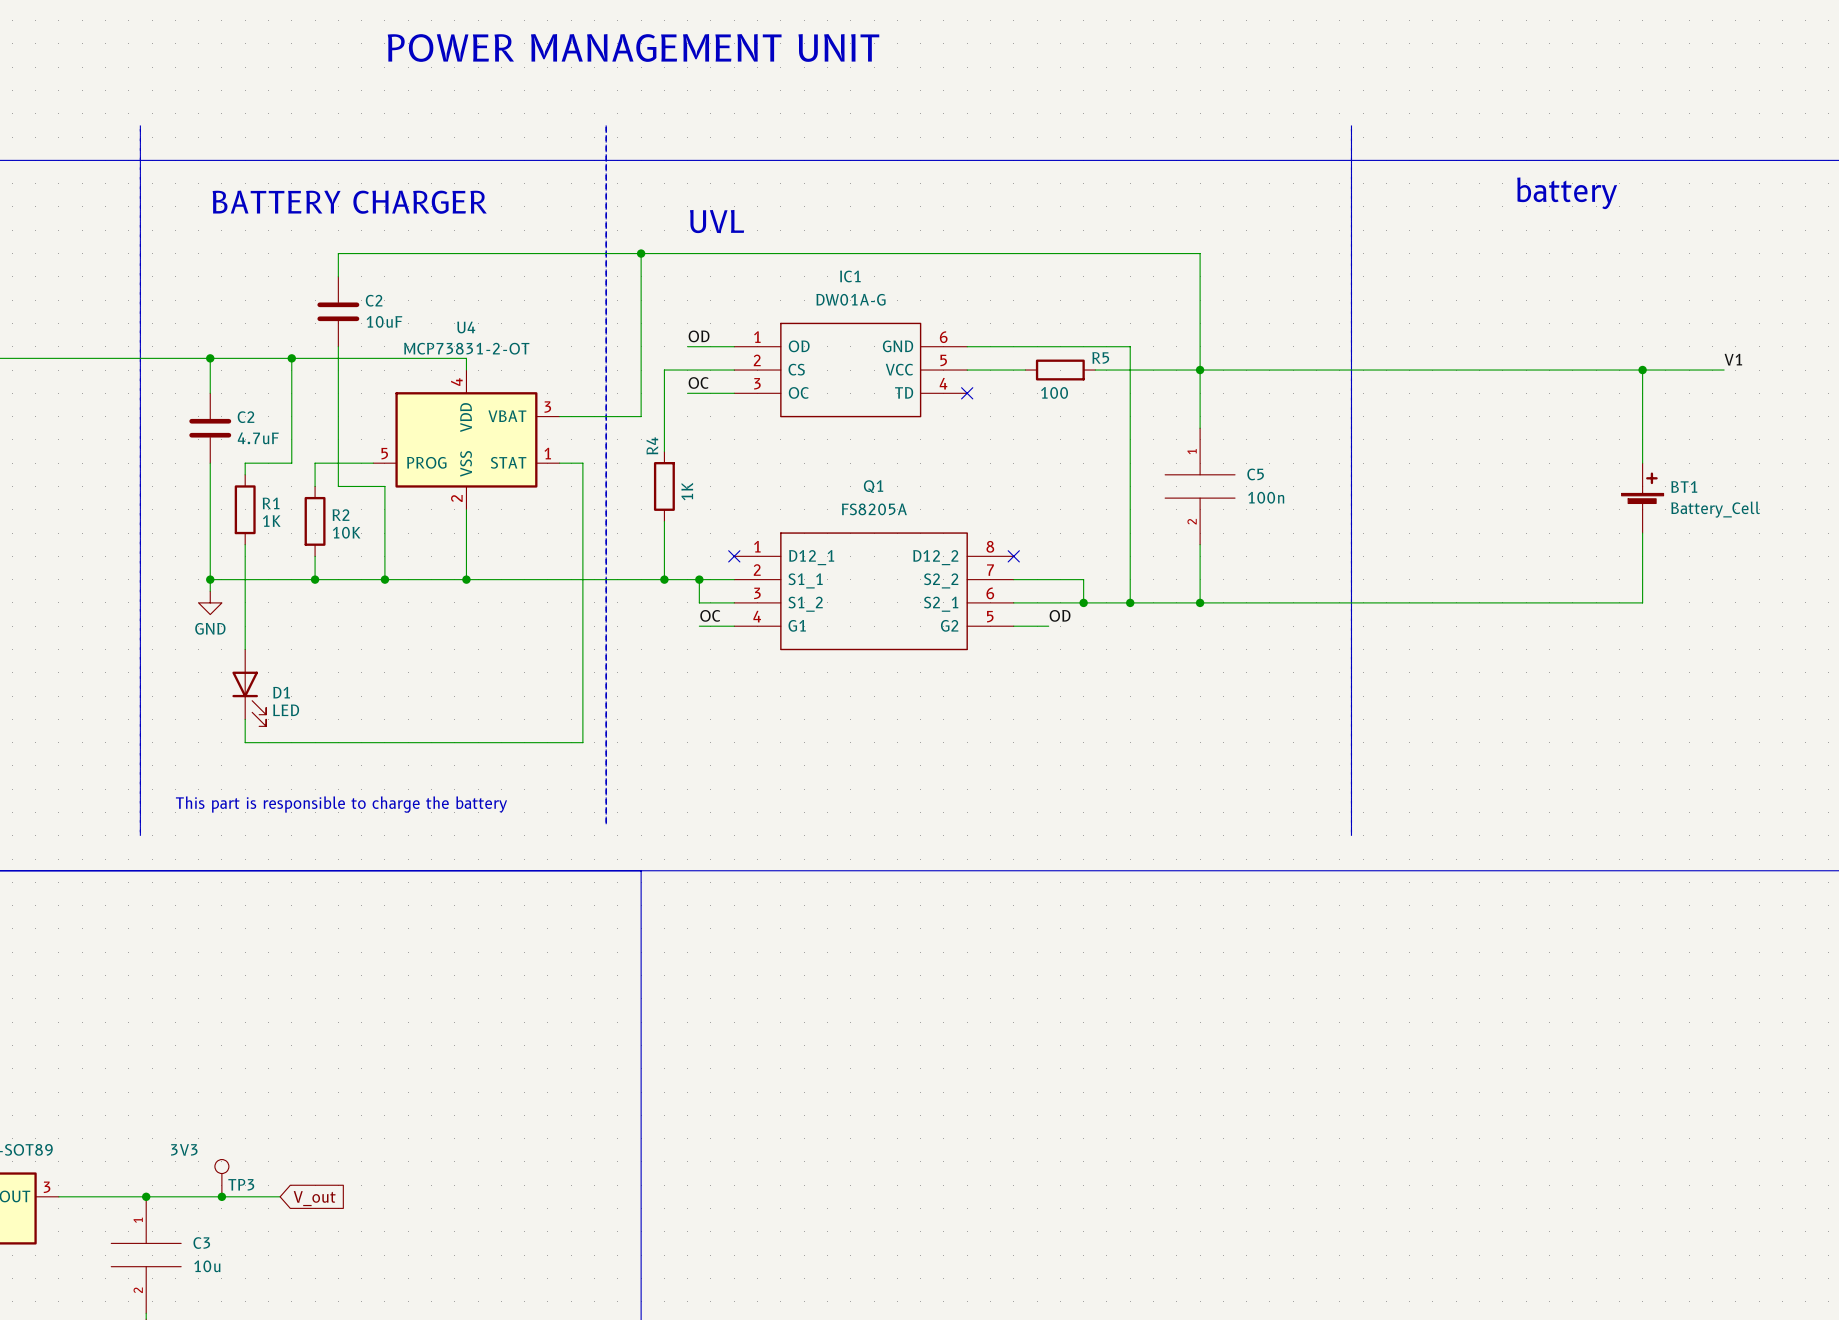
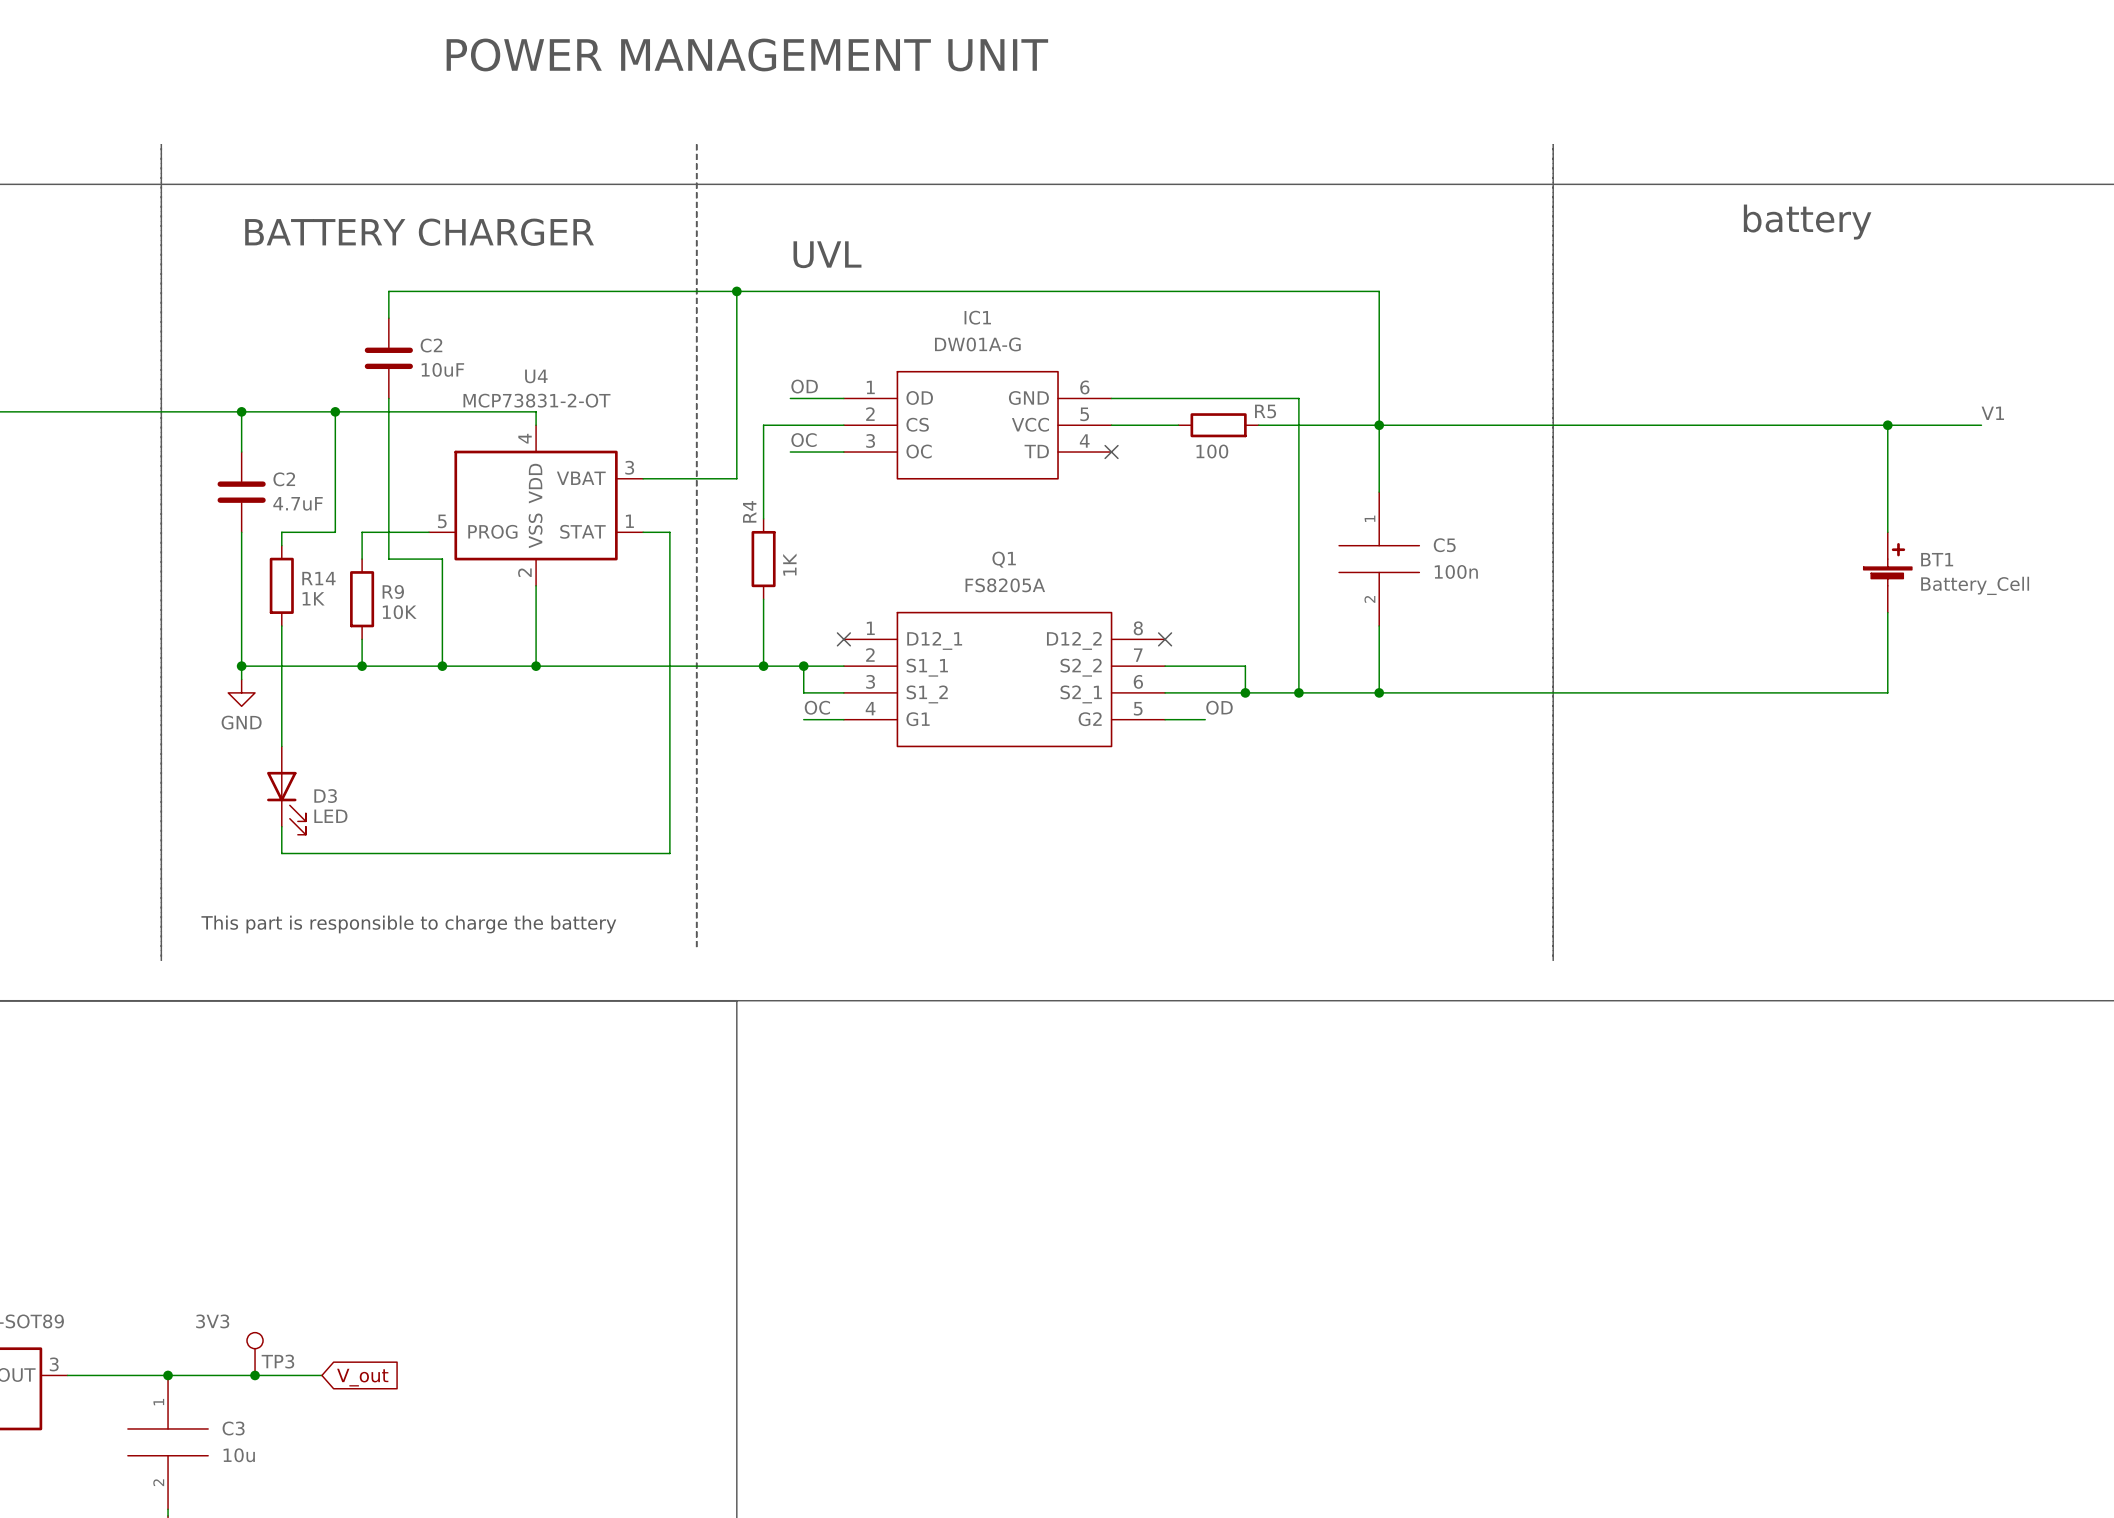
R1 name: R1 (271, 503) -> R14 (318, 578)
R2 name: R2 (340, 515) -> R9 (393, 591)
D1 name: D1 (281, 692) -> D3 (325, 796)

